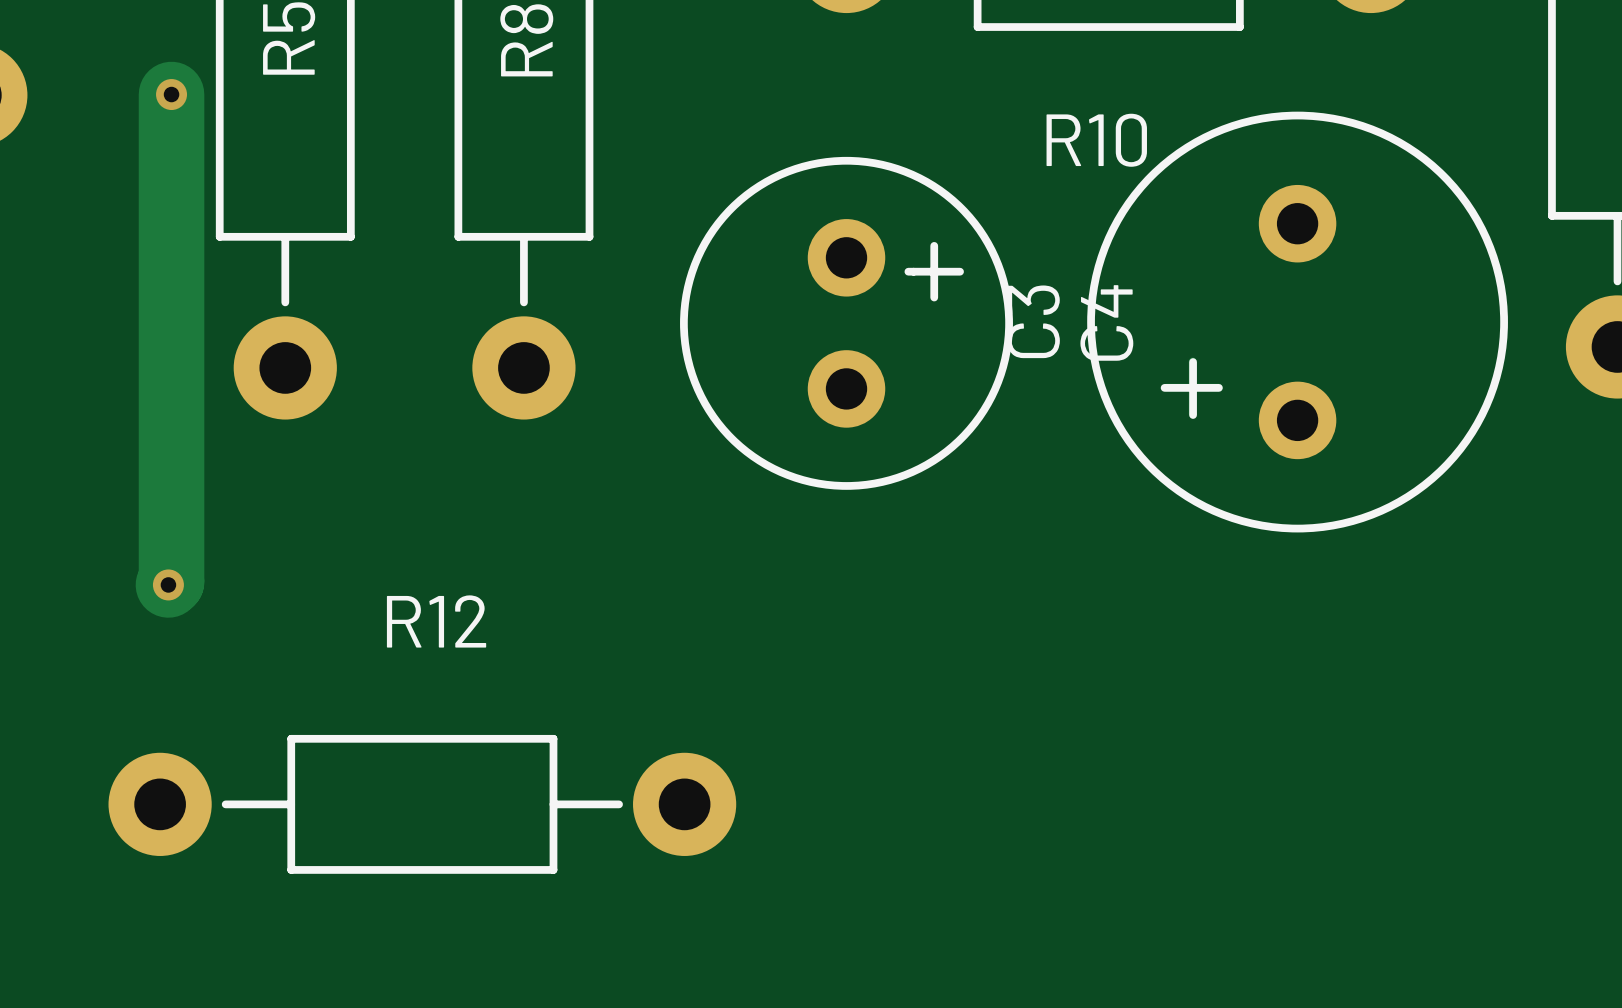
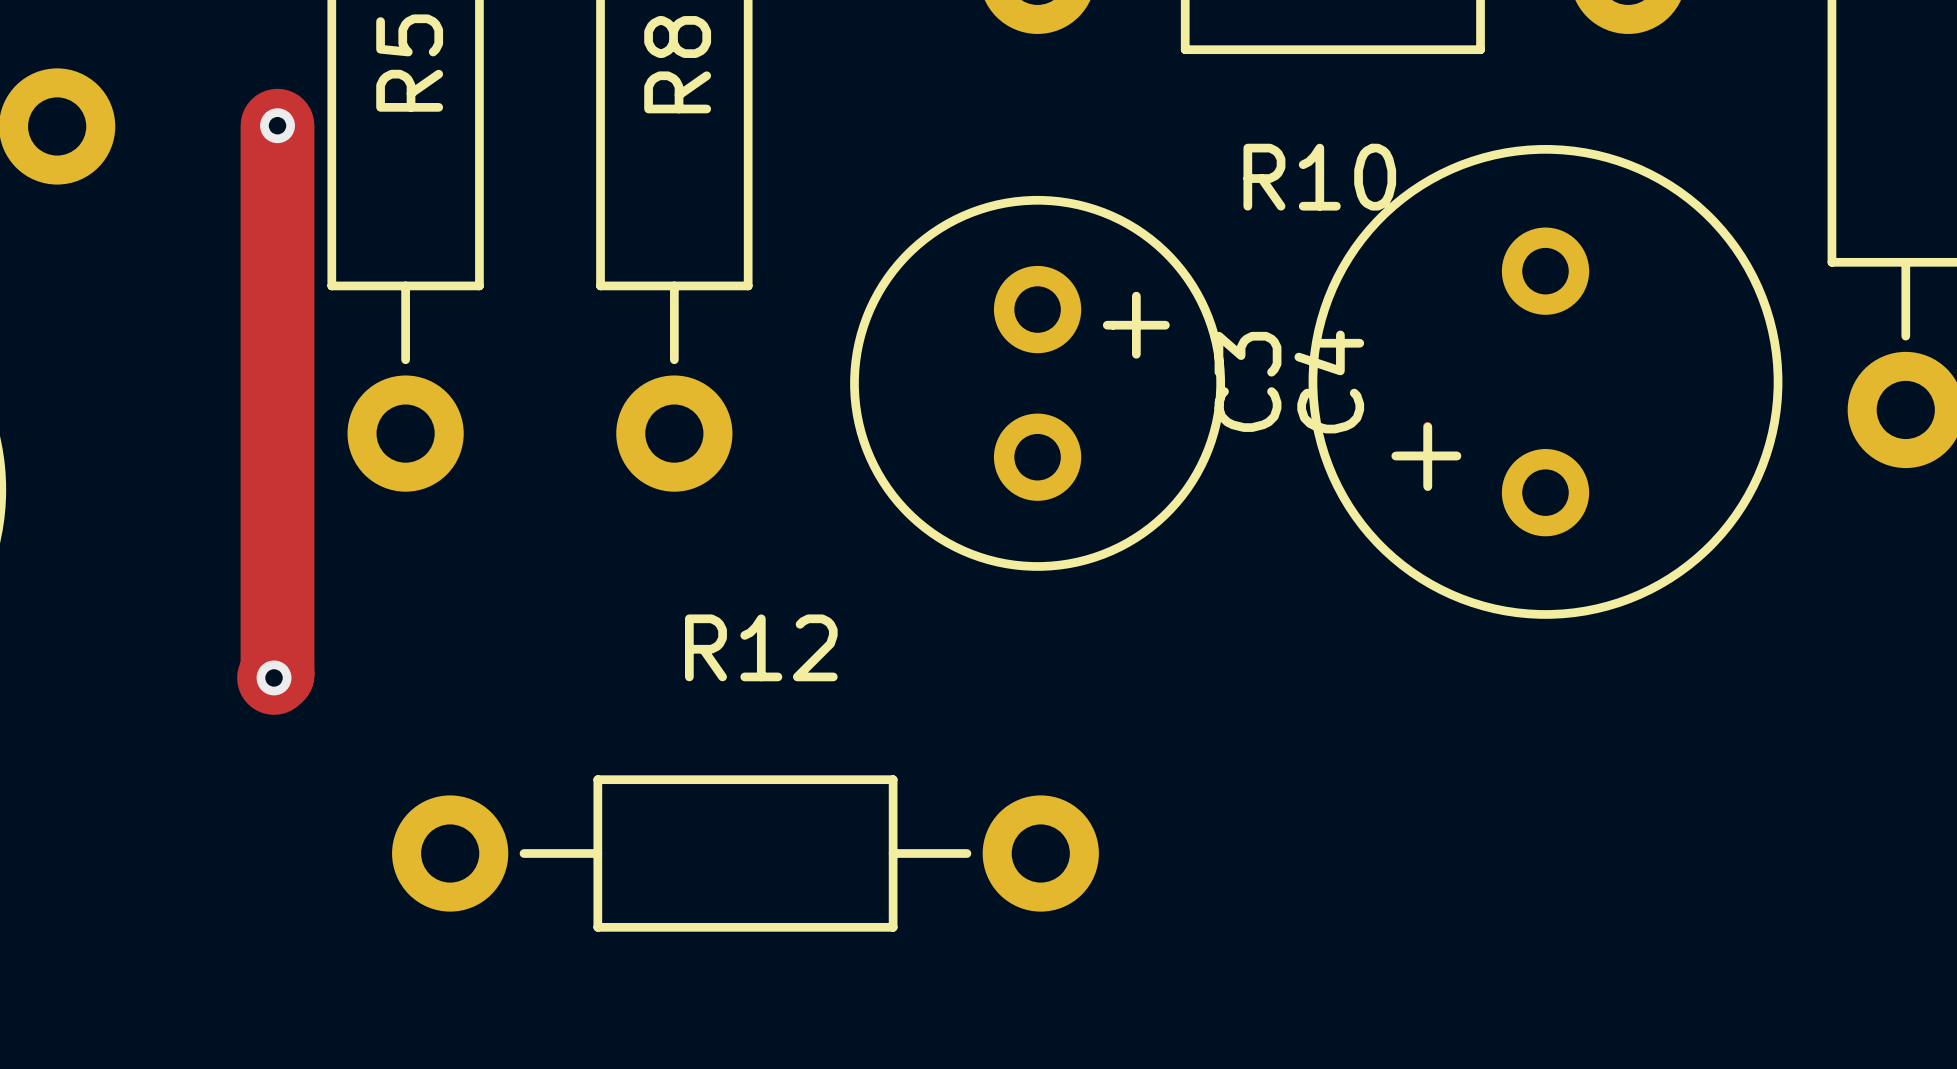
R12 position: (422, 804) -> (745, 853)

